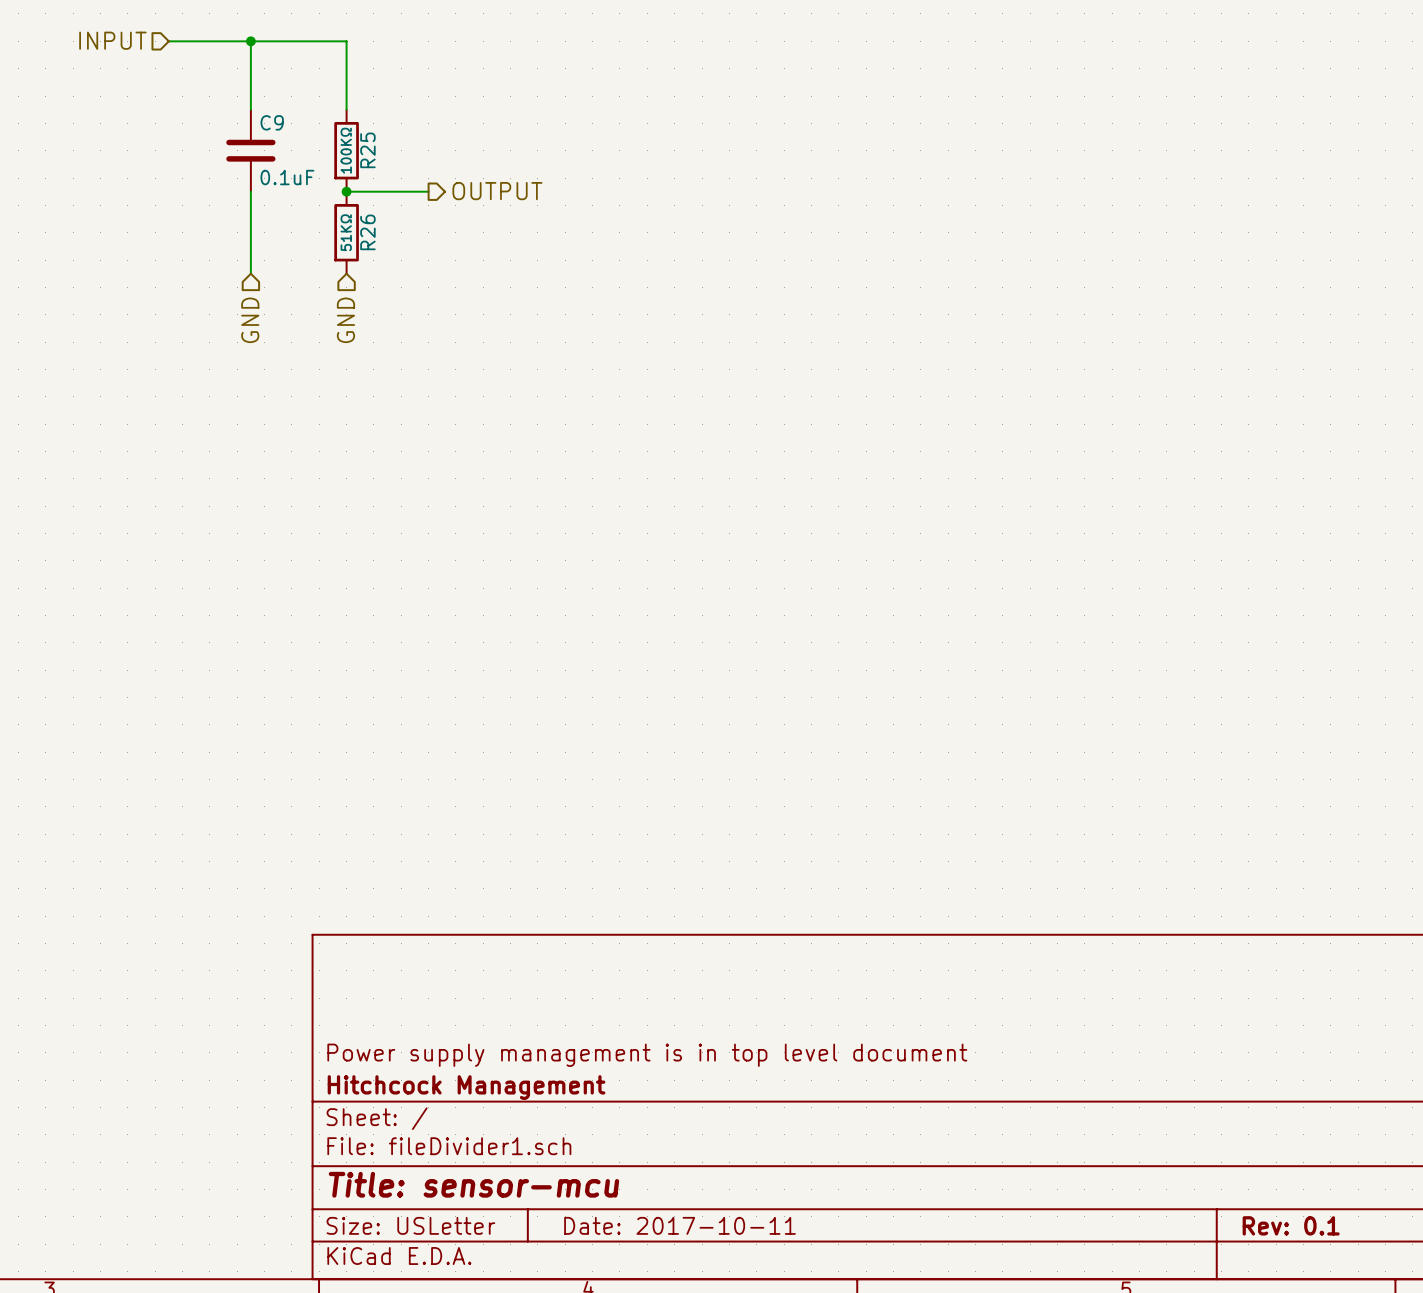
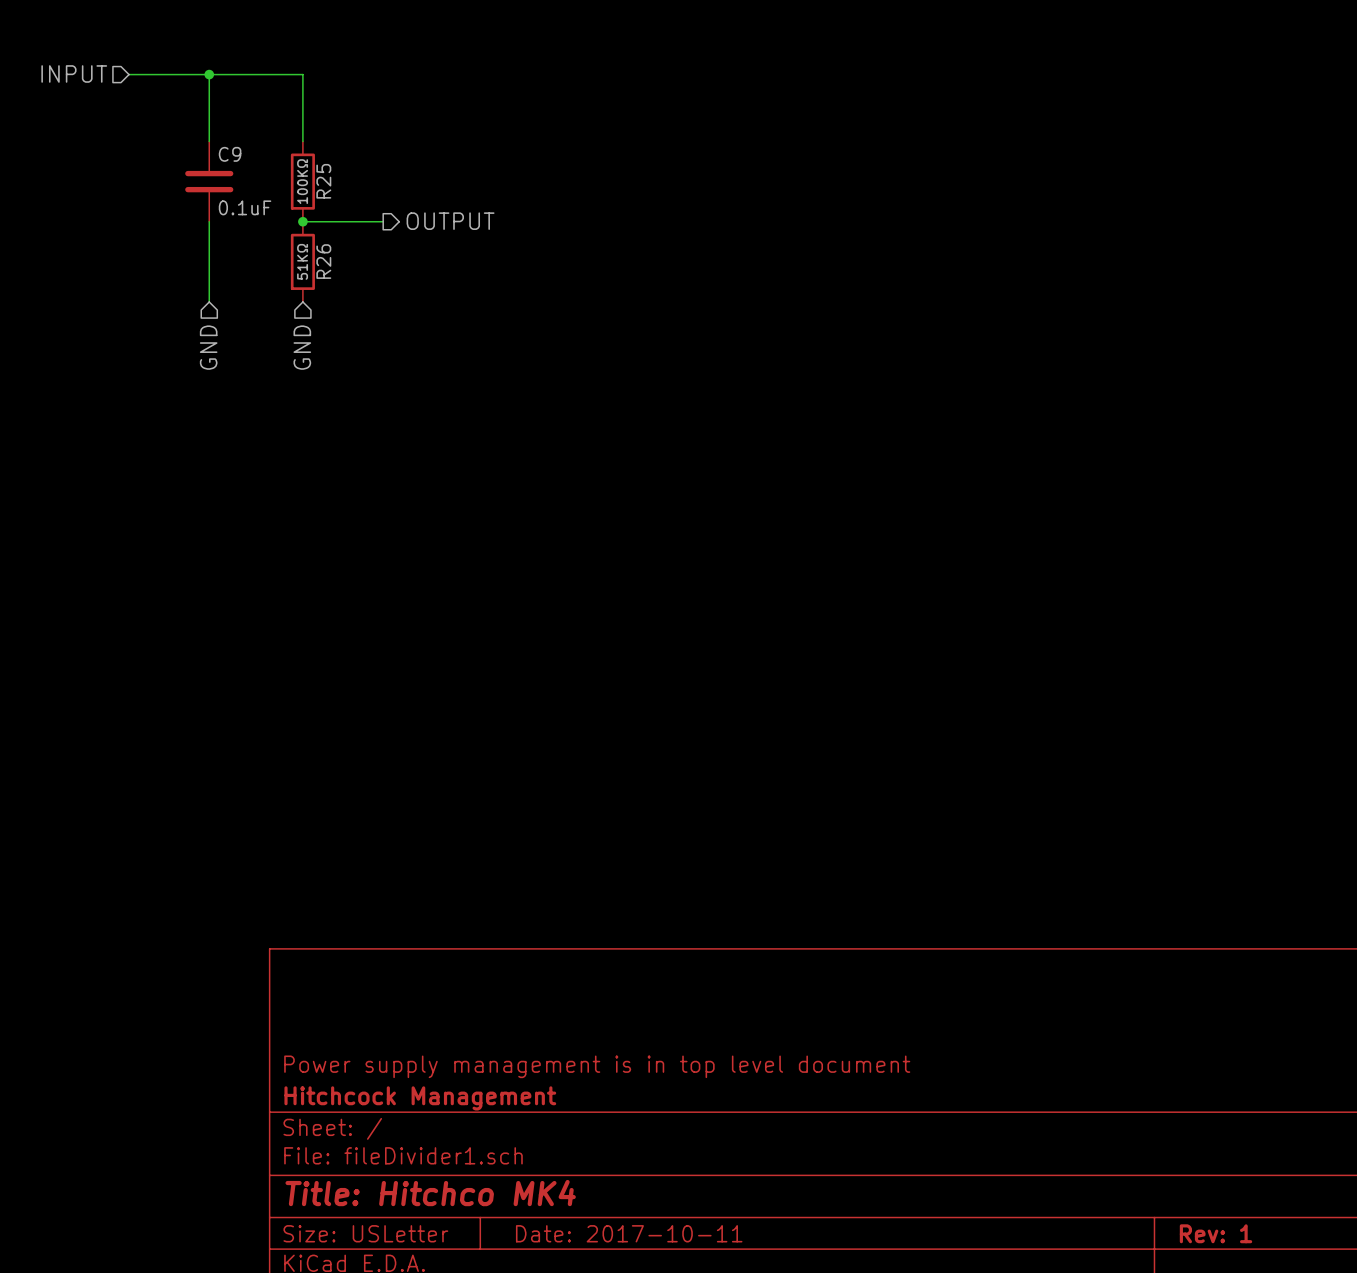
title block: Title: sensor-mcu (473, 1184) -> Title: Hitchco MK4 (430, 1193)
title block: Rev: 0.1 (1291, 1225) -> Rev: 1 (1216, 1233)

